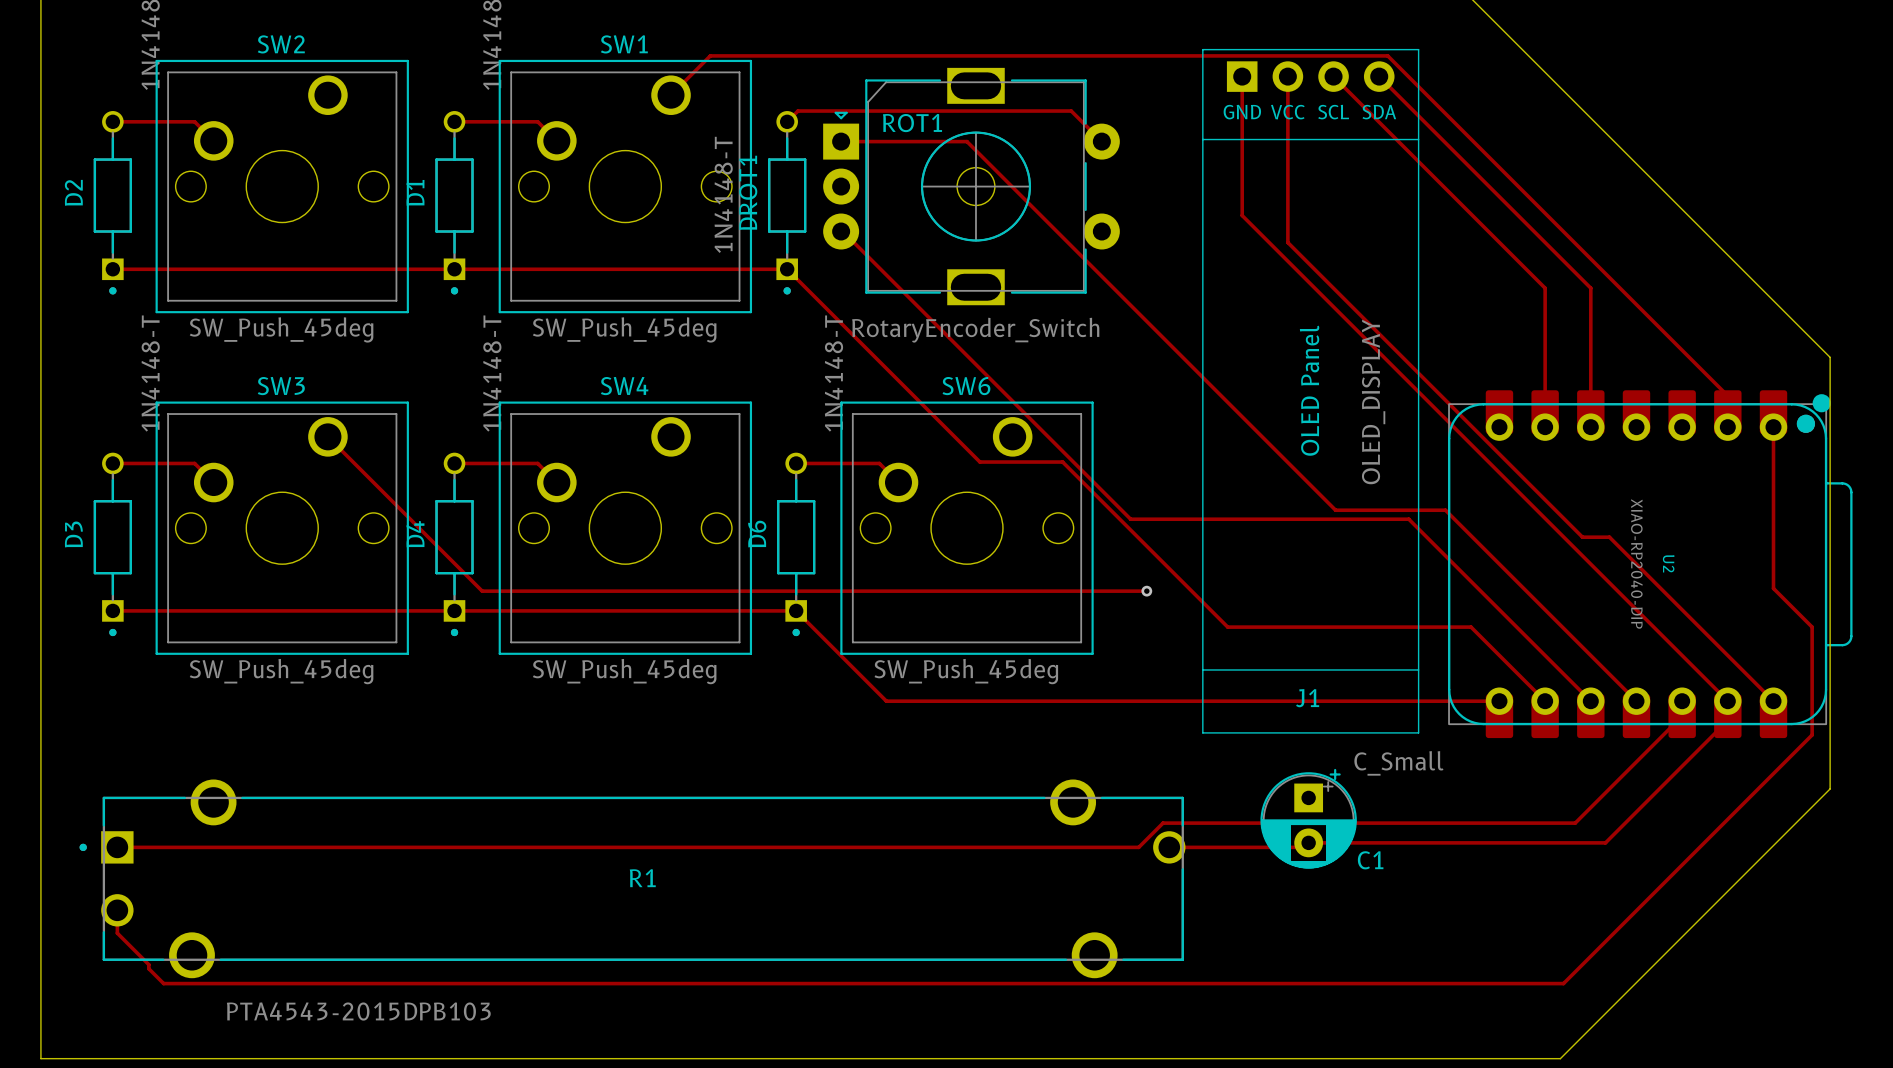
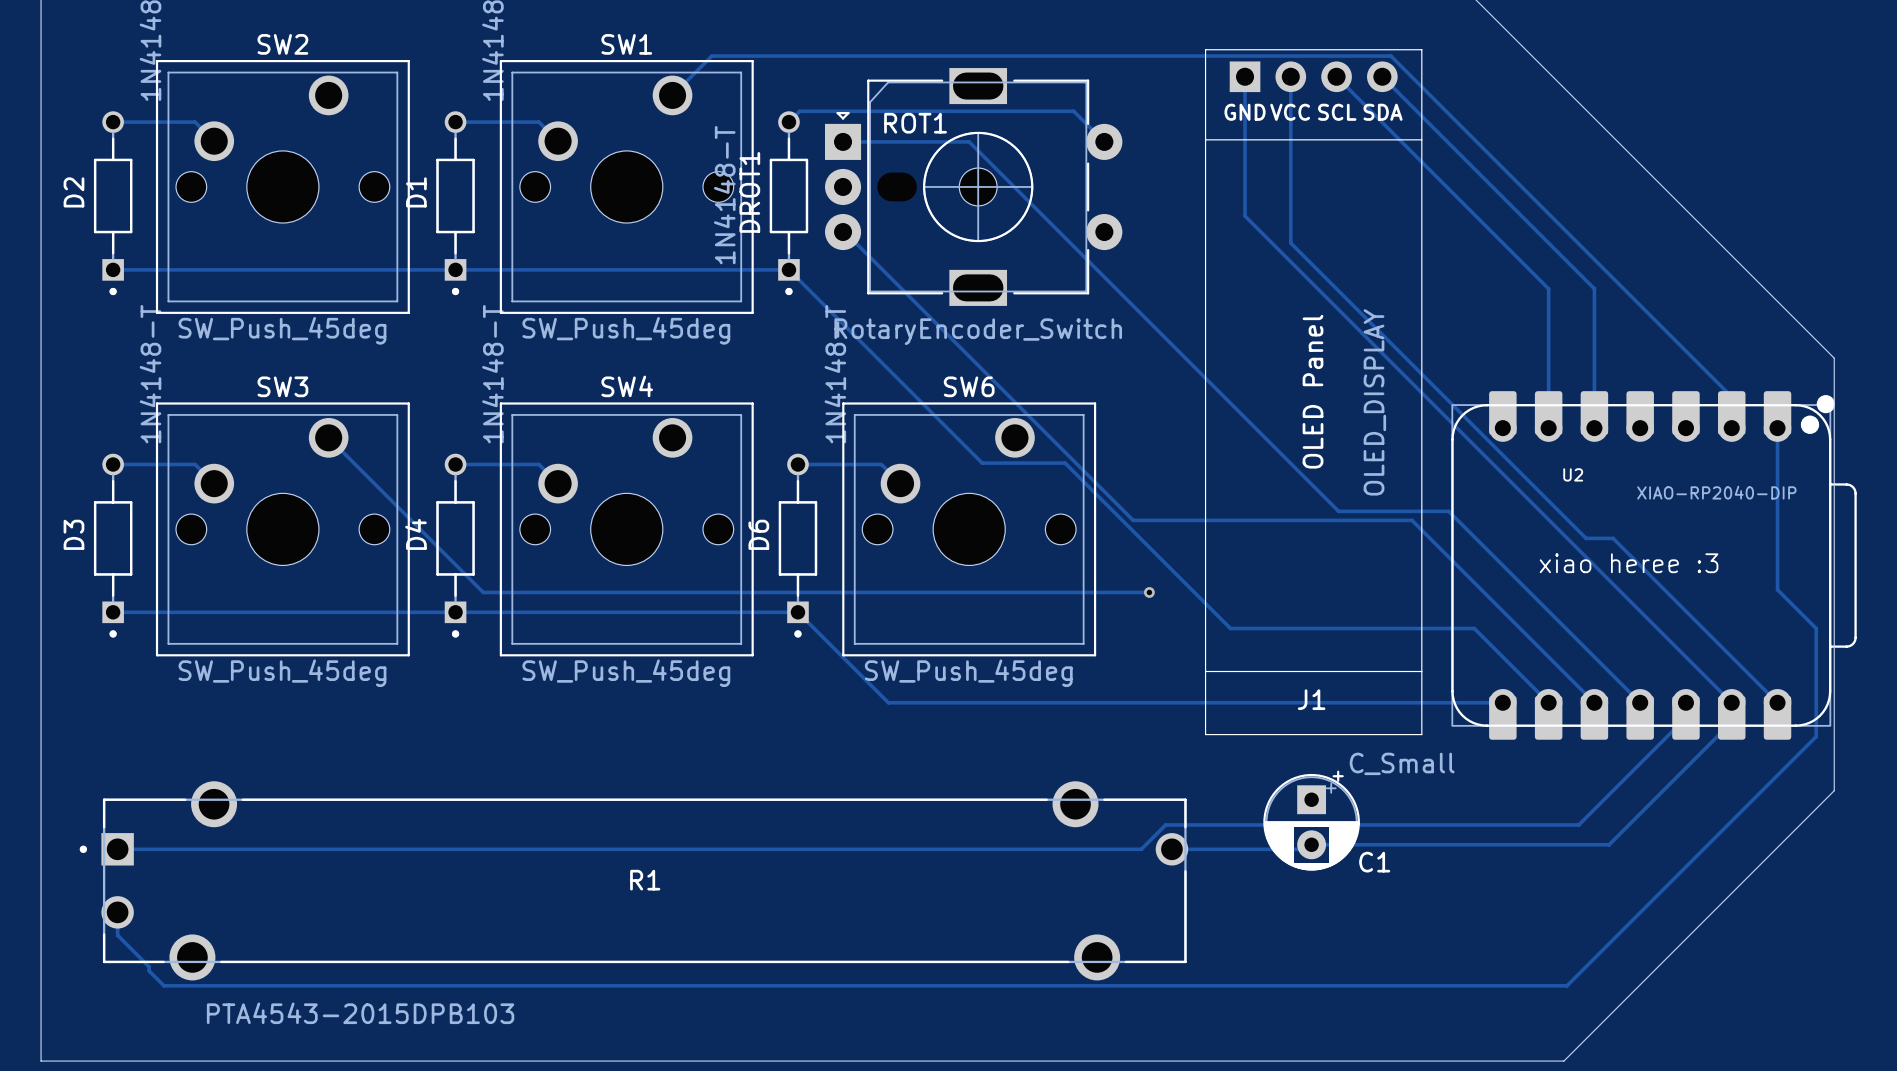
text: none -> xiao heree :3 (1629, 563)
U2 value rotation: 0° (1636, 563) -> 90° counterclockwise (1716, 492)
U2 name rotation: 0° (1668, 563) -> 90° counterclockwise (1573, 474)
U2 name position: U2 (1668, 563) -> U2 (1573, 474)

